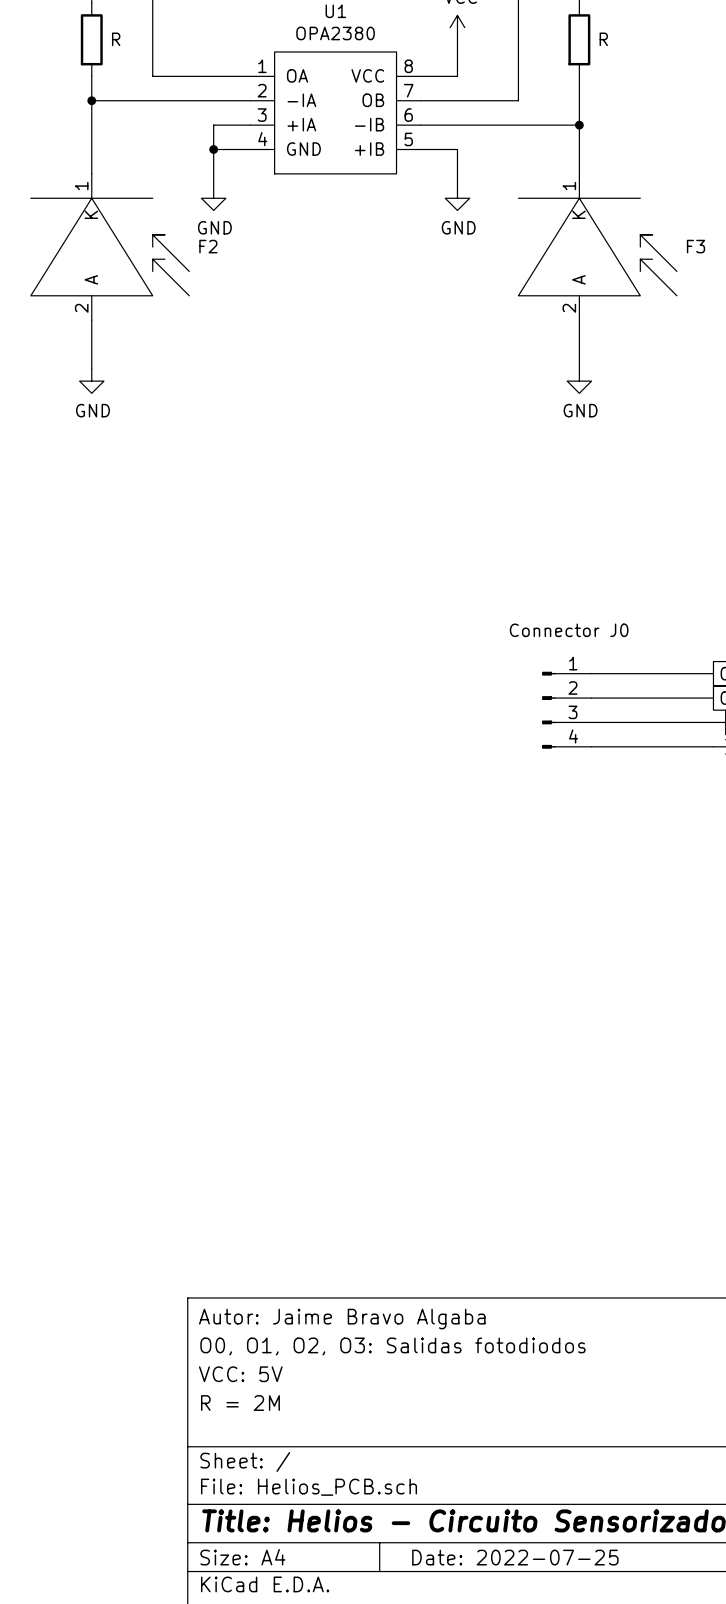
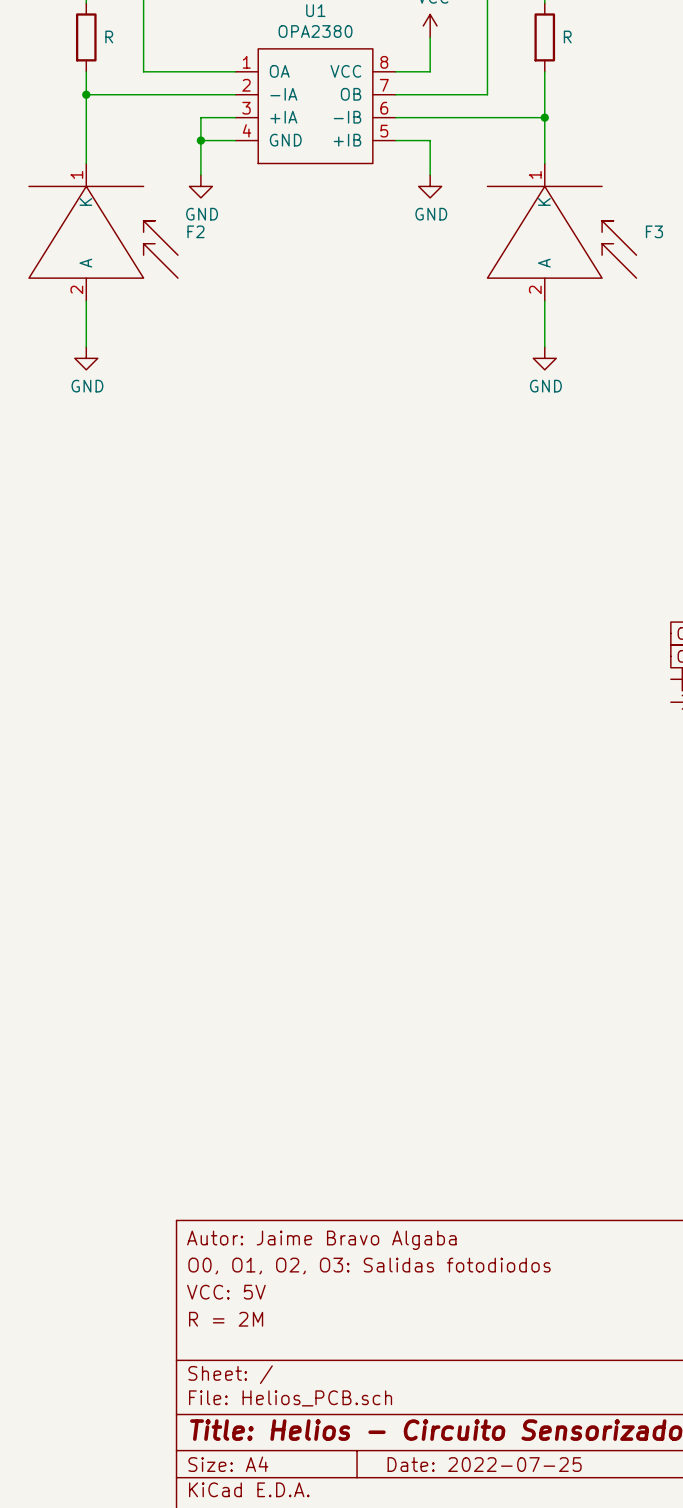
wire: (591, 673) (713, 673) -> none
wire: (591, 698) (713, 698) -> none
part: Connector J0 (566, 710) -> none
wire: (591, 722) (713, 722) -> none
wire: (591, 746) (713, 746) -> none

